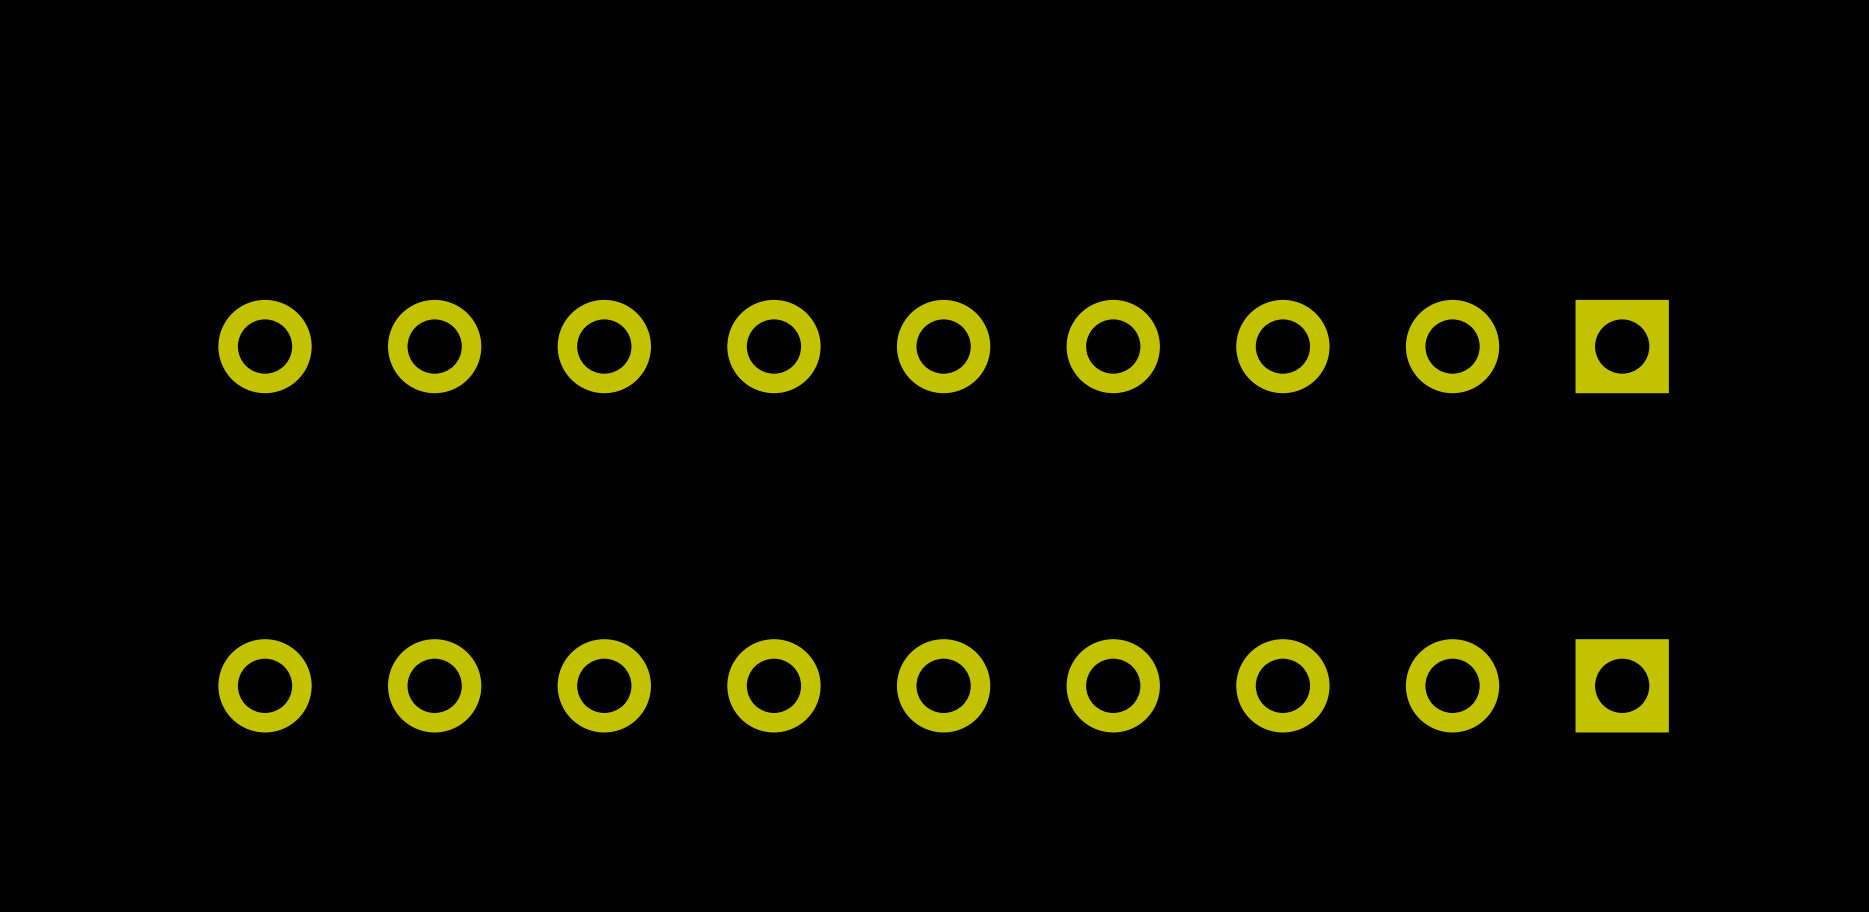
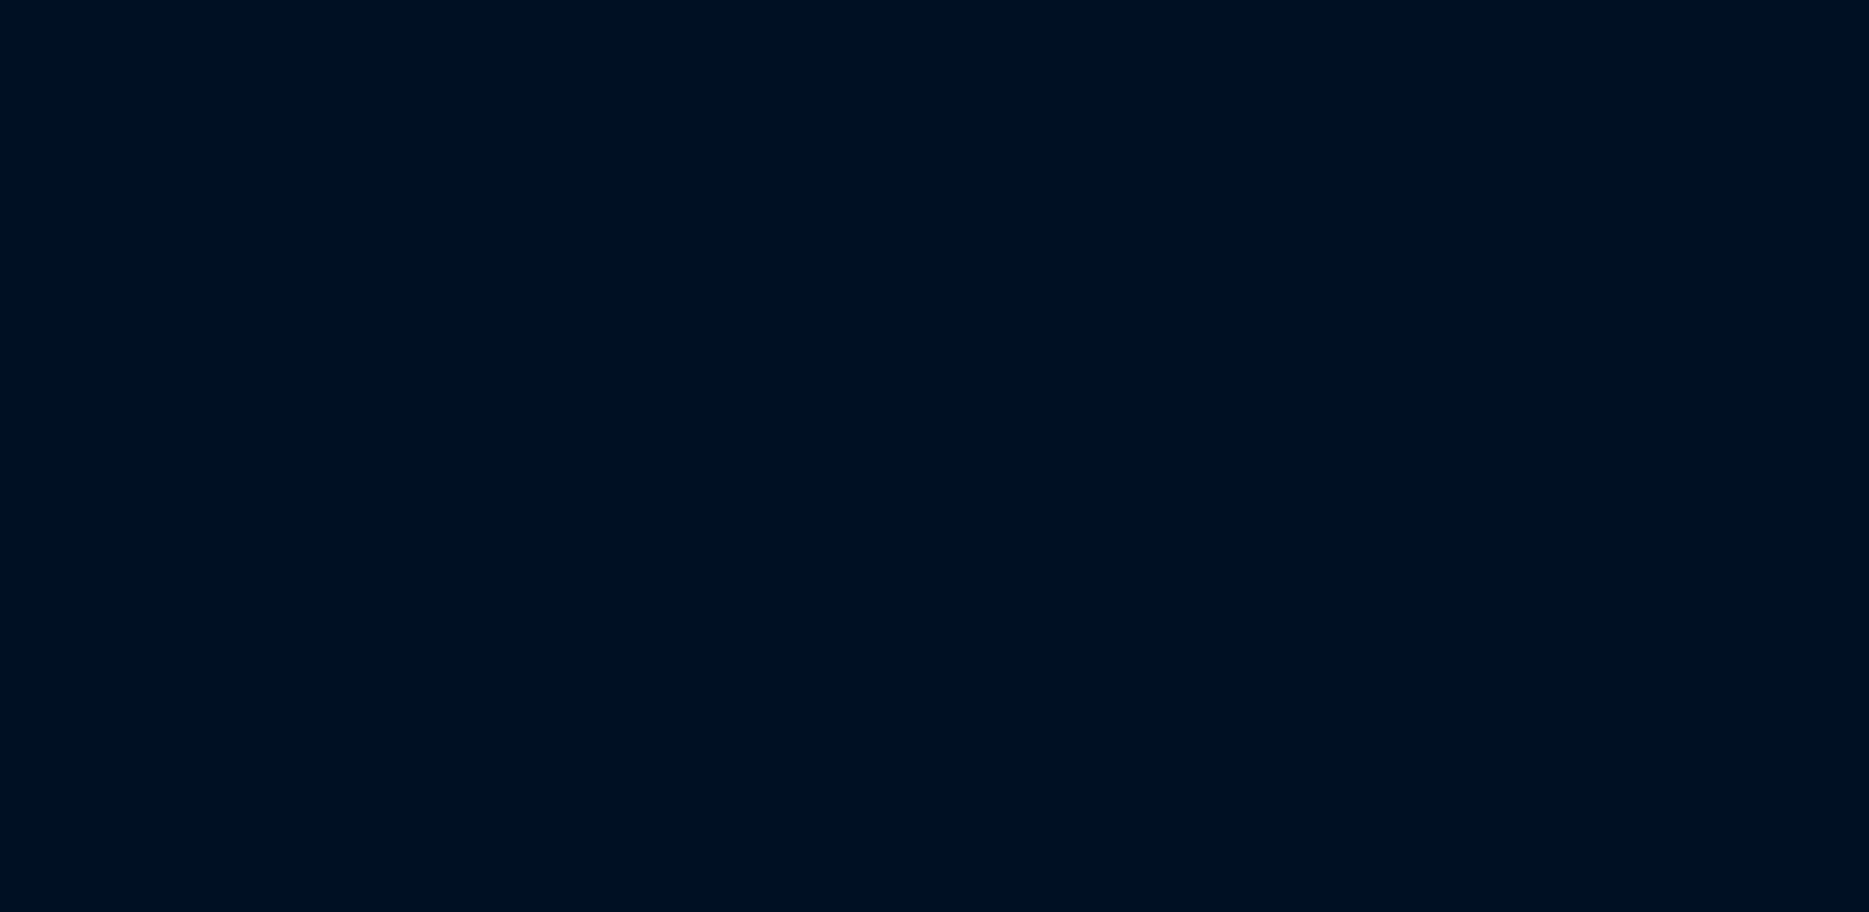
part: (943, 346) -> none
part: (943, 685) -> none

